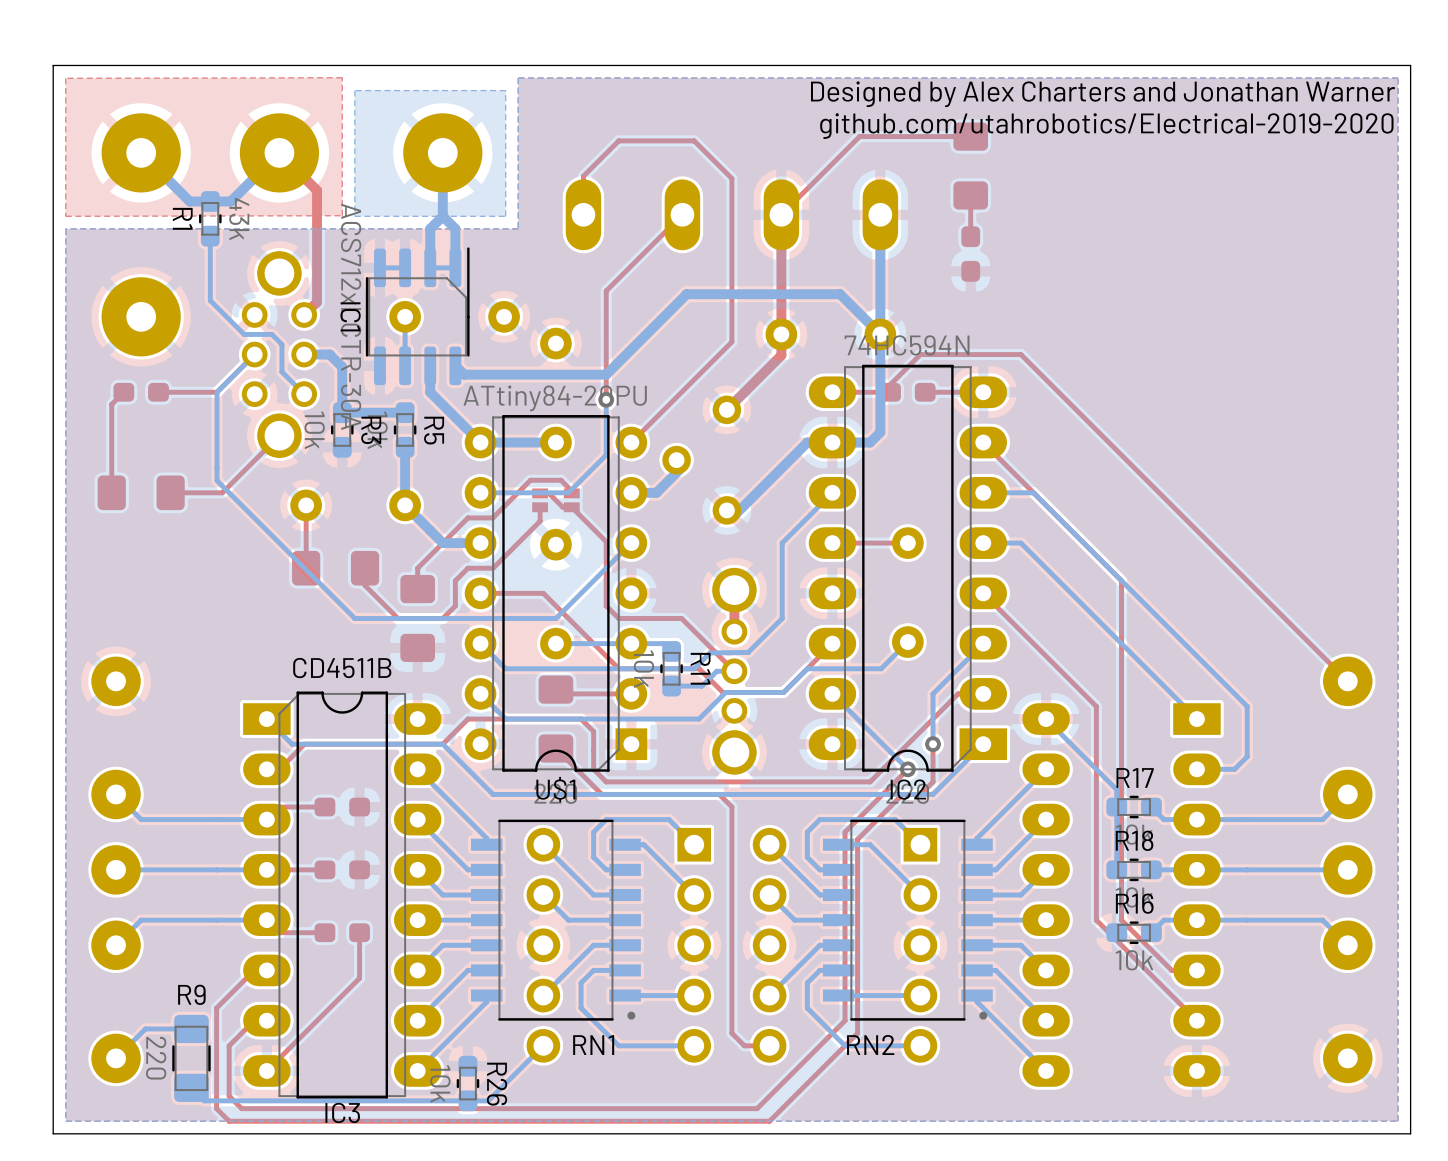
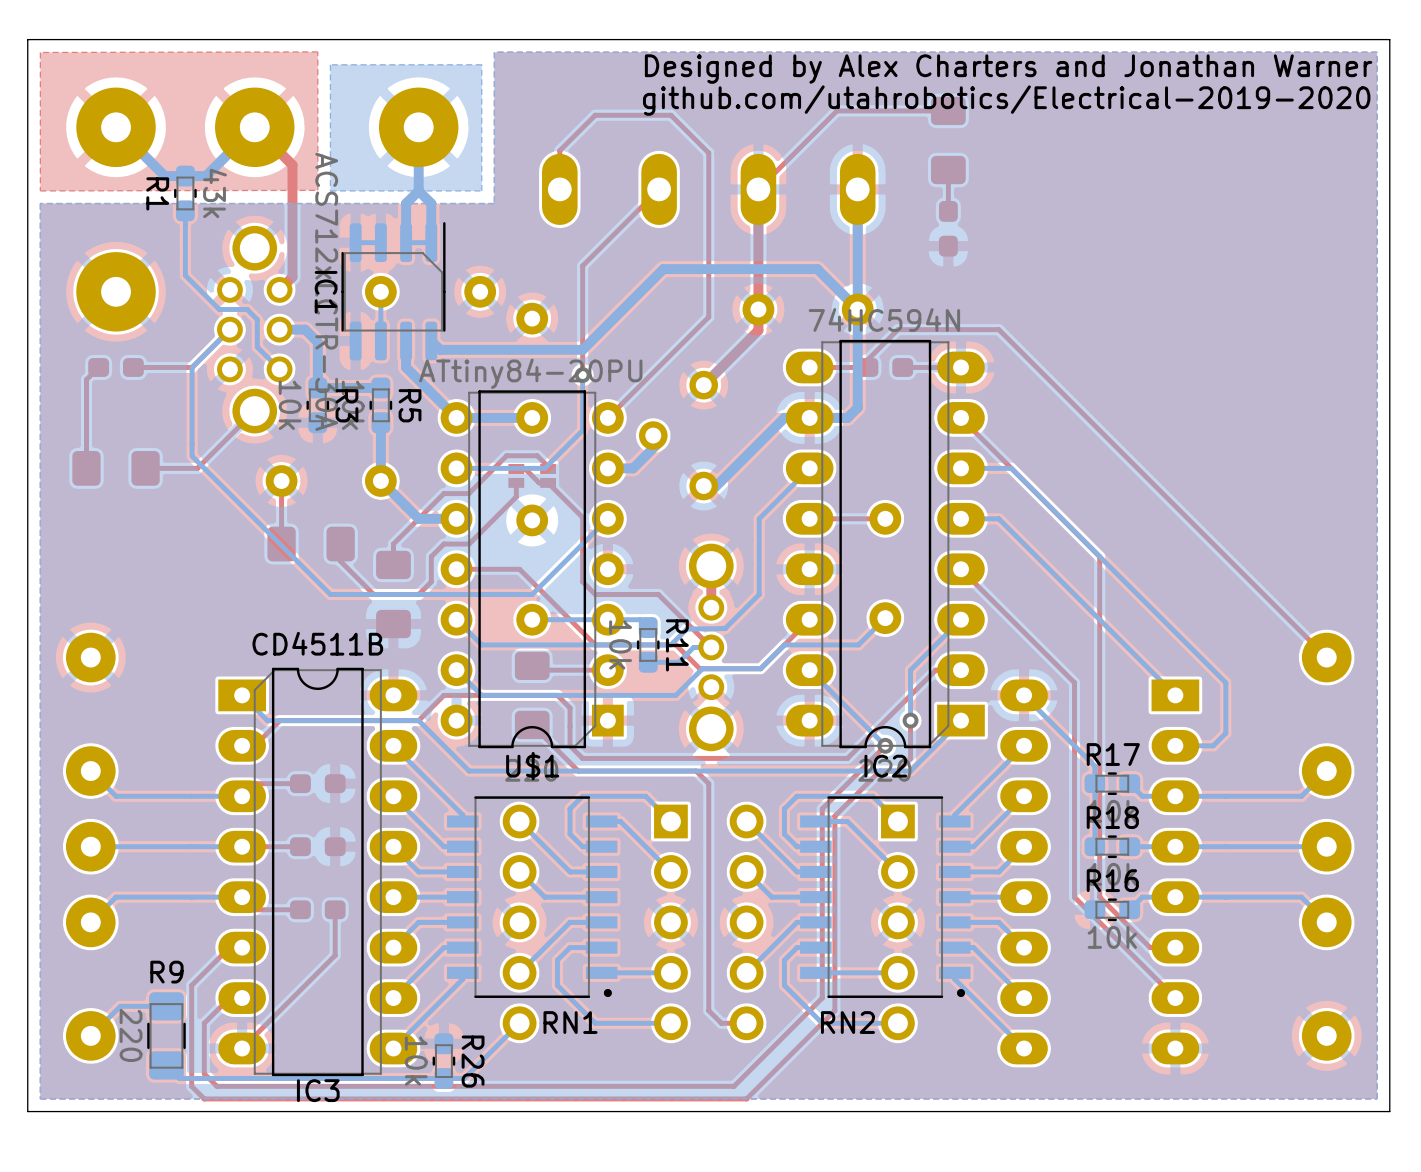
RN1 footprint: [471, 819, 641, 1021] -> [447, 796, 618, 998]
RN2 footprint: [822, 819, 993, 1021] -> [800, 796, 971, 998]

